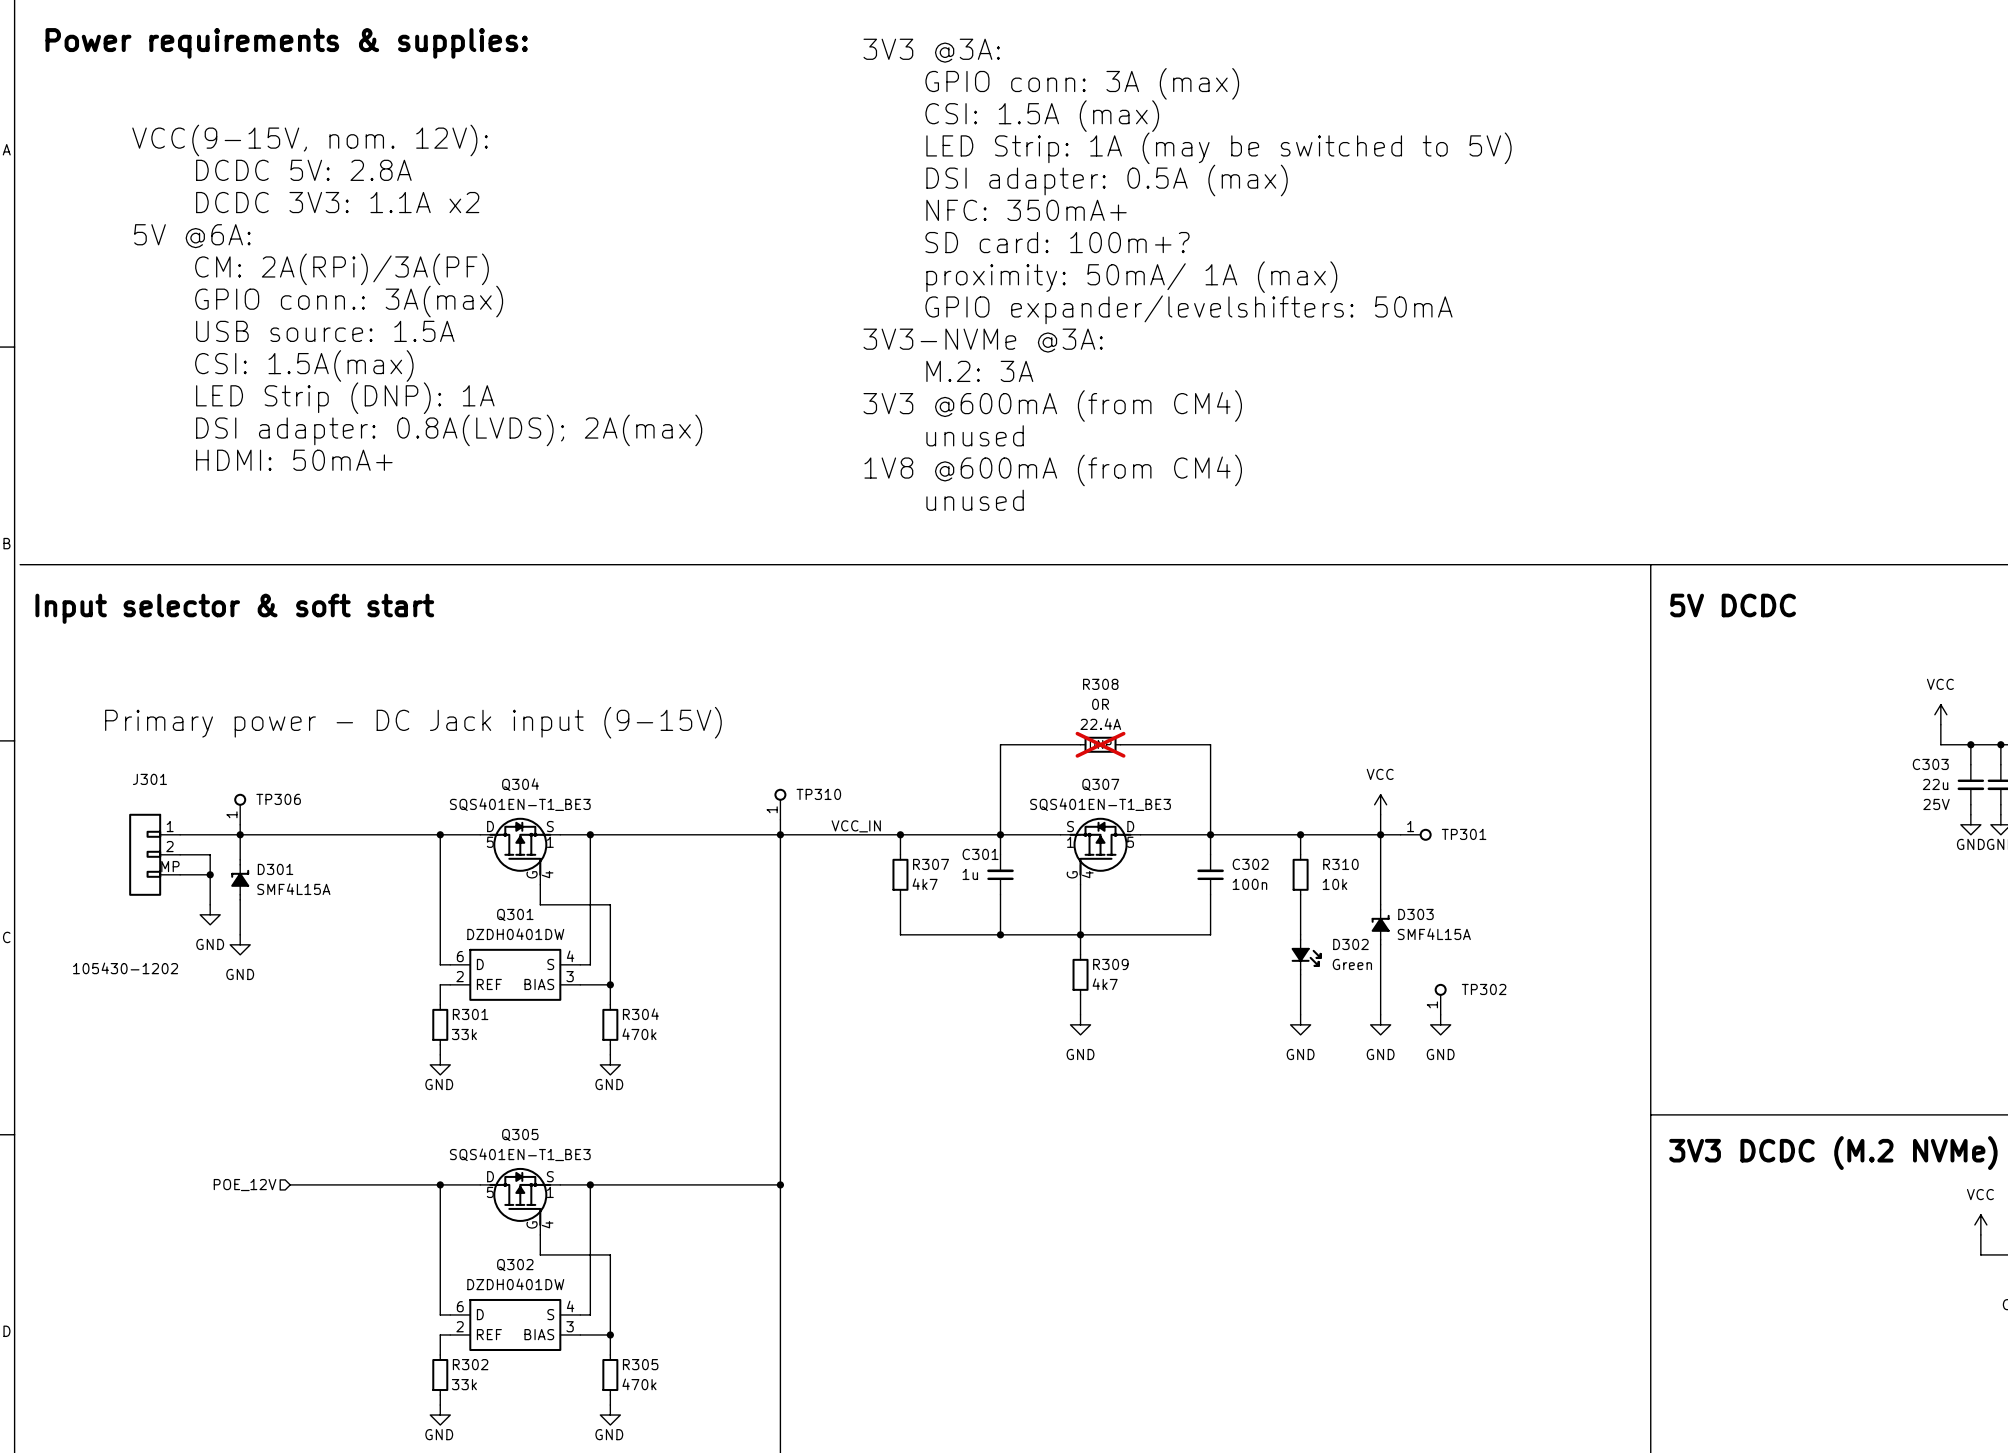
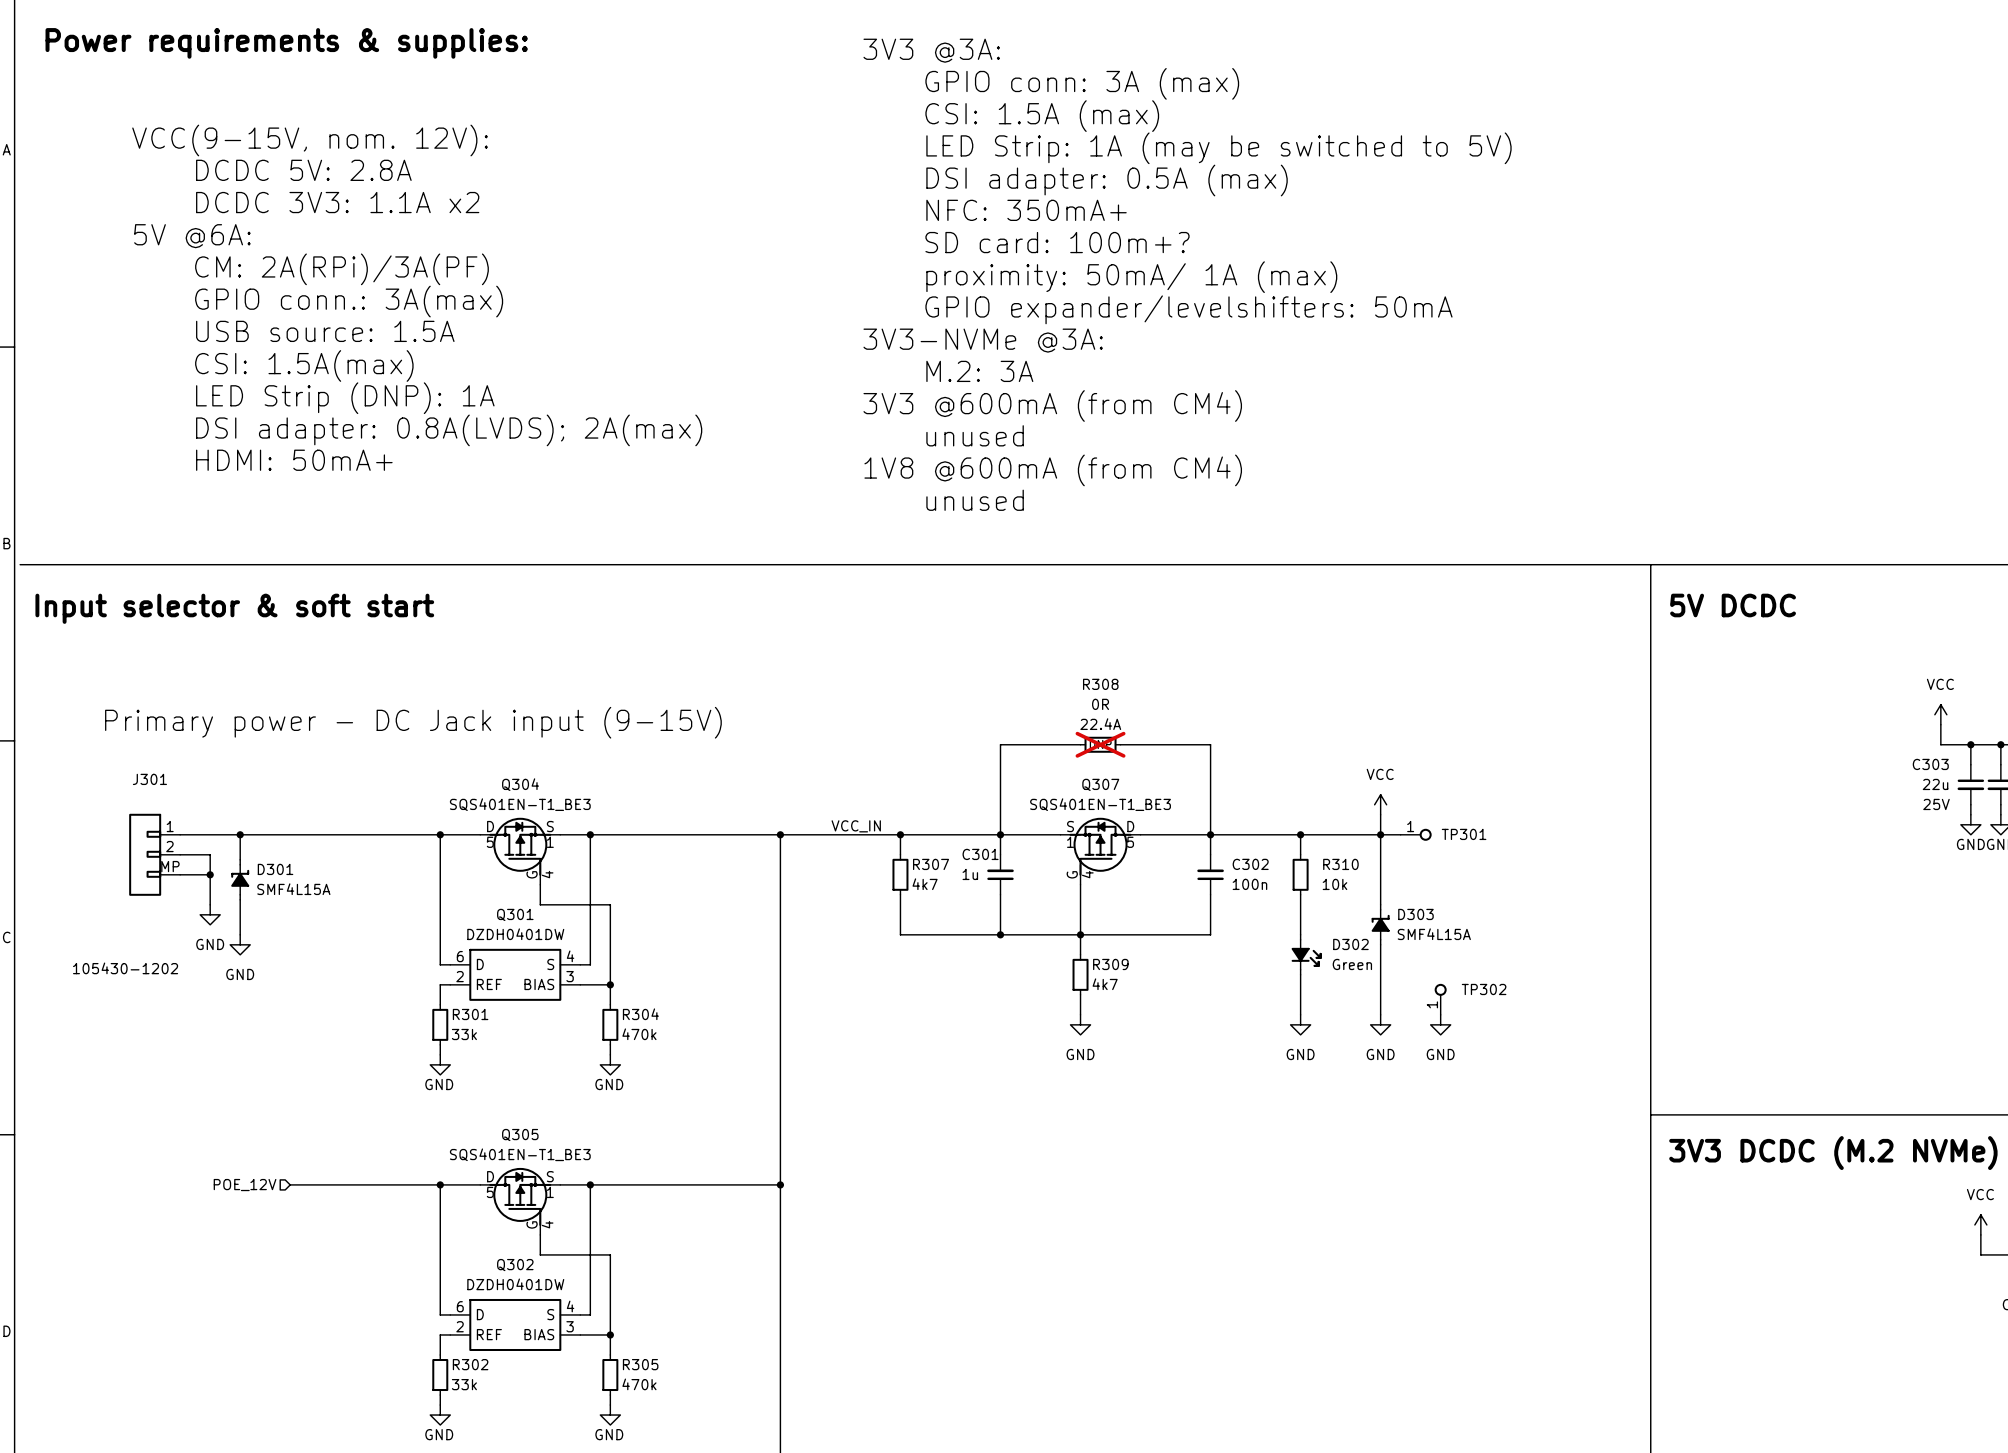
TP310: (780, 804) -> none
TP306: (240, 809) -> none
wire: (780, 819) (780, 834) -> none
wire: (240, 824) (240, 834) -> none

